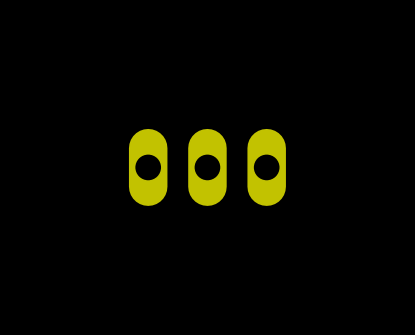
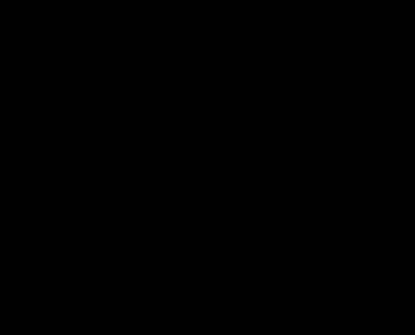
part: (207, 167) -> none

